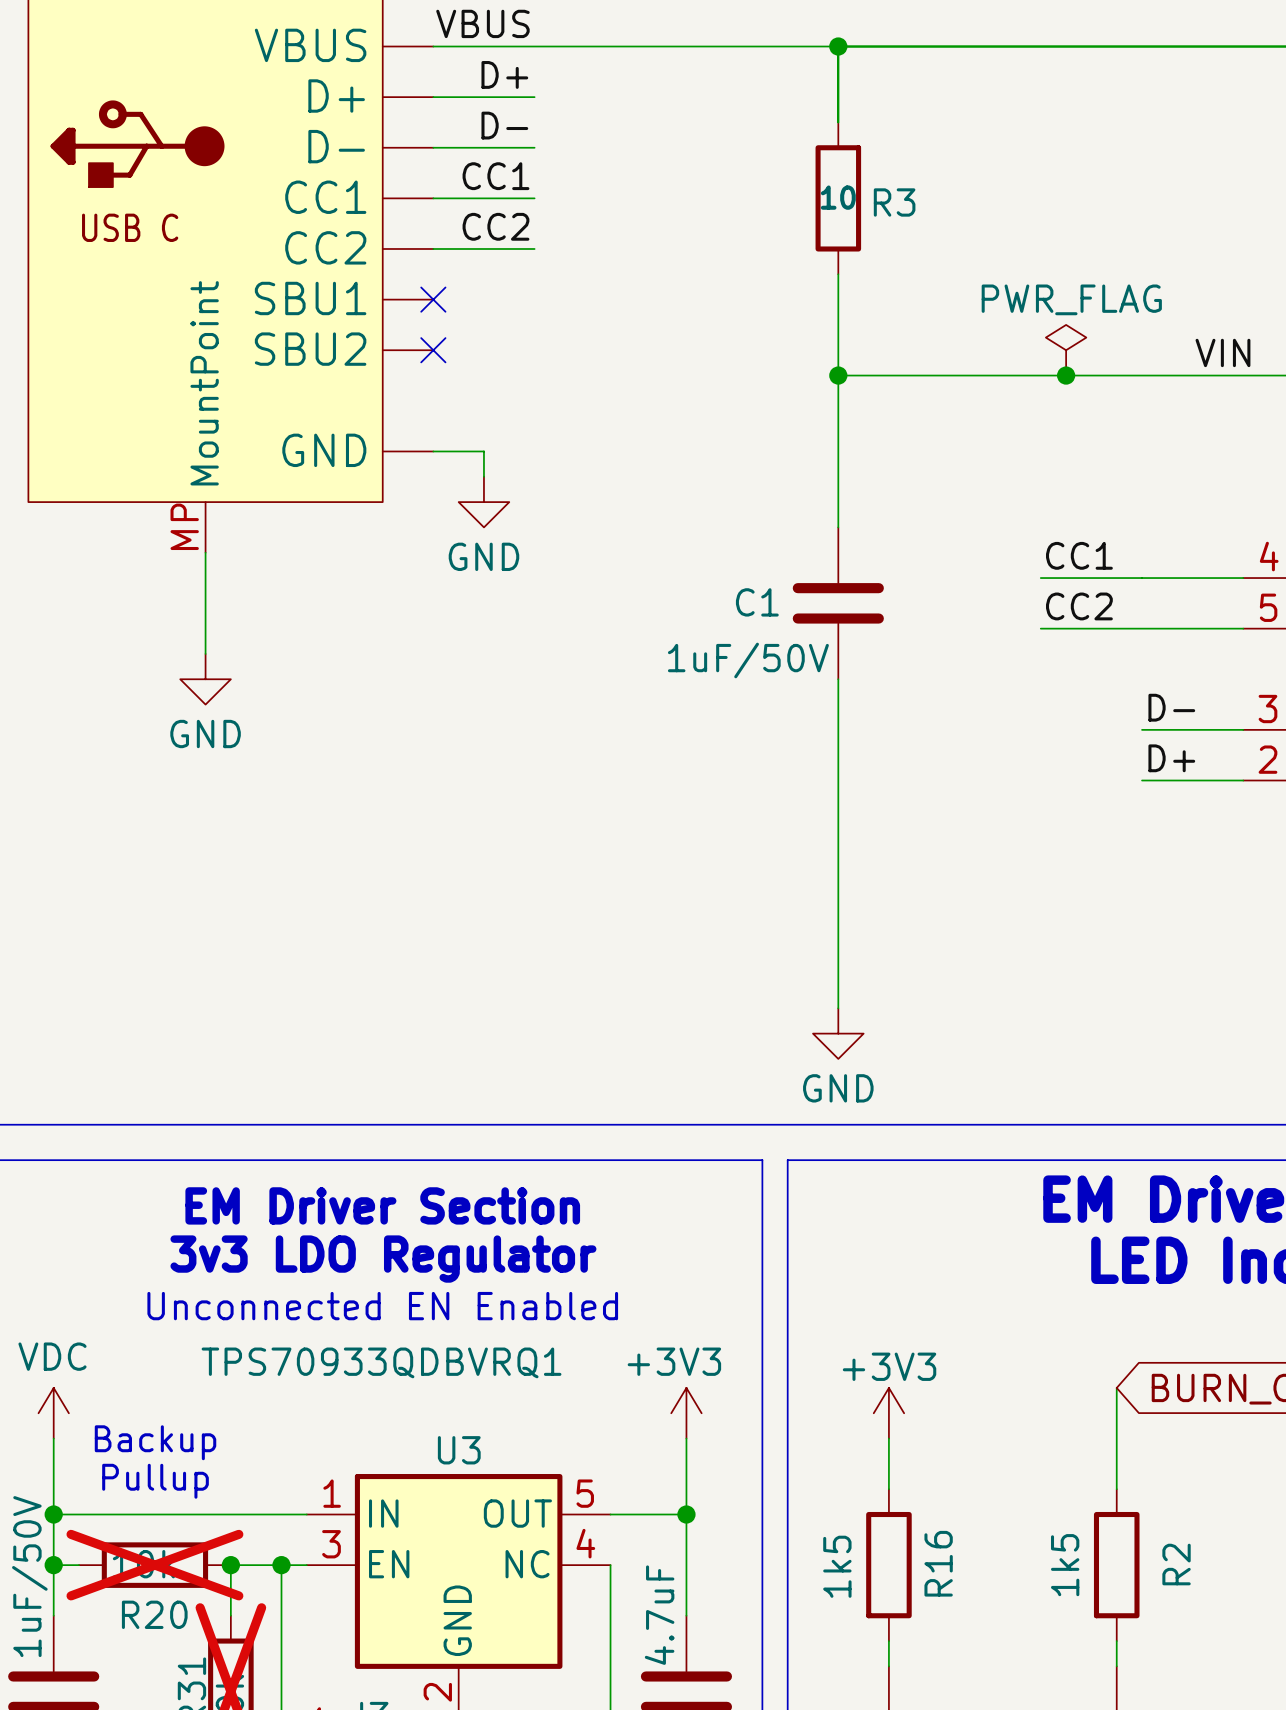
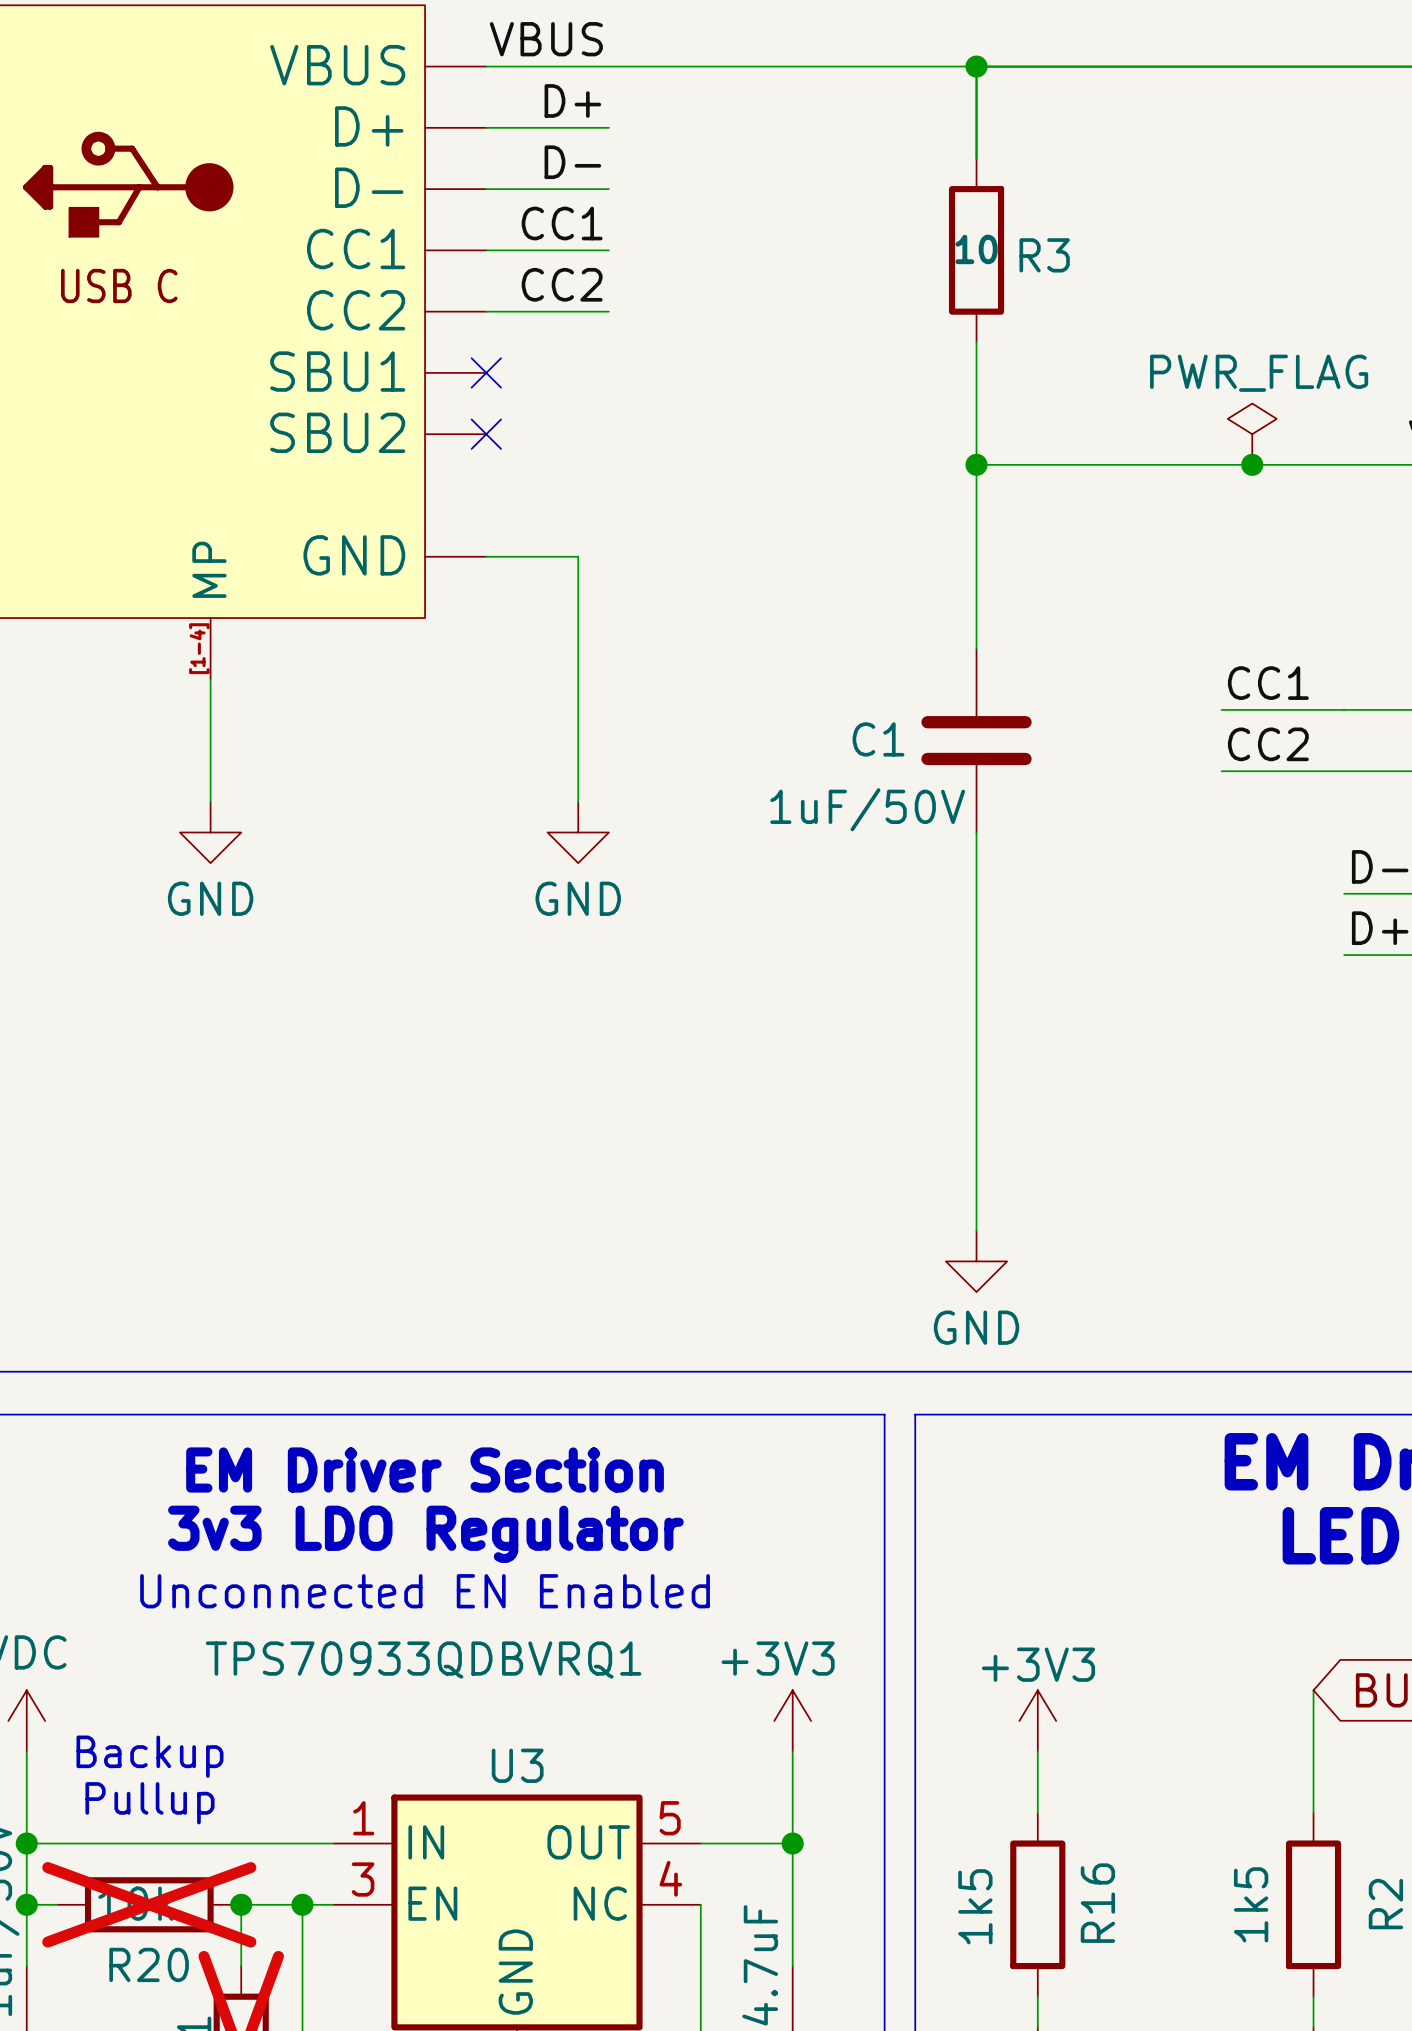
part pin name: MountPoint (204, 383) -> MP (209, 569)
wire: (483, 451) (483, 476) -> (547, 556) (578, 556) (578, 801)
power symbol position: GND (483, 502) -> GND (578, 832)
part pin number: MP (184, 526) -> [1-4] (199, 648)

